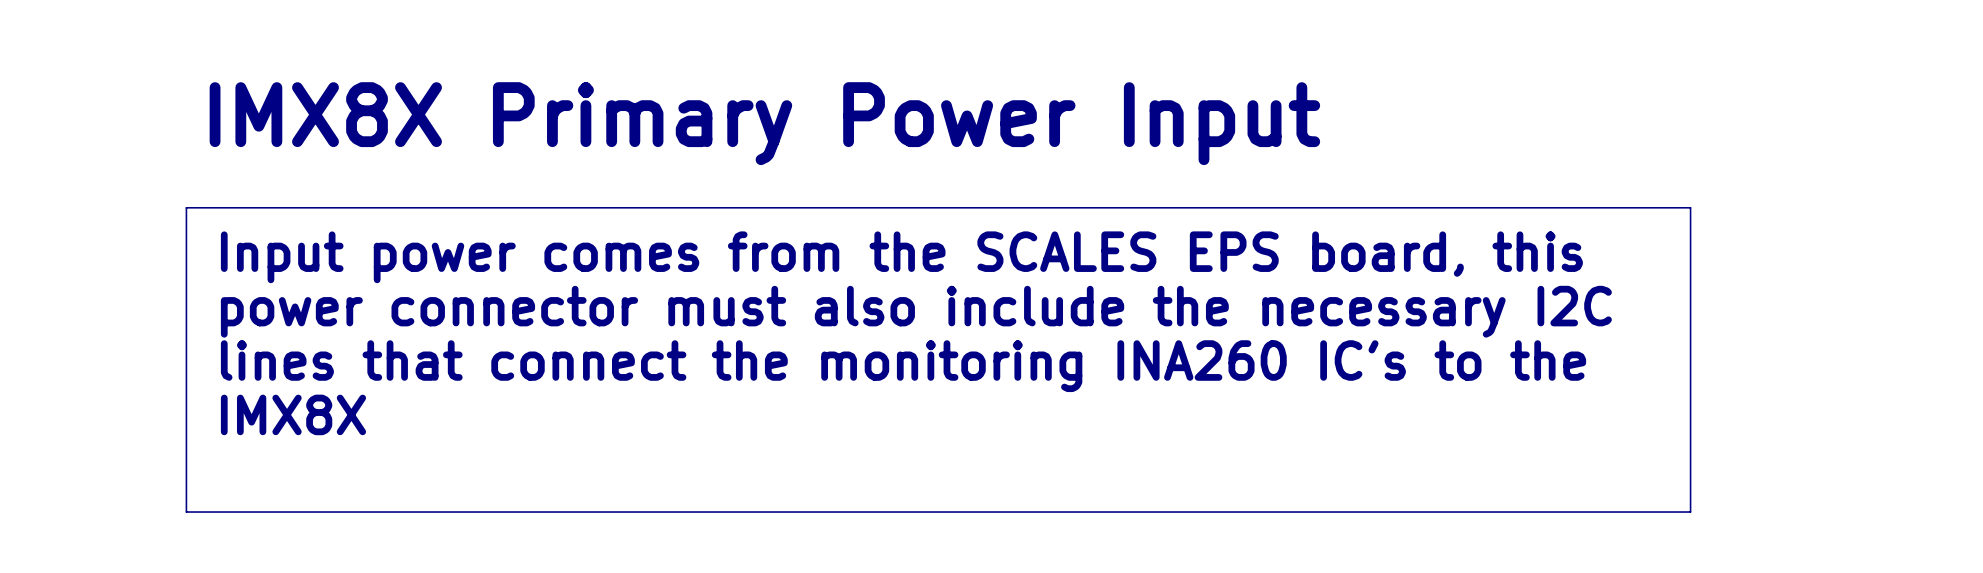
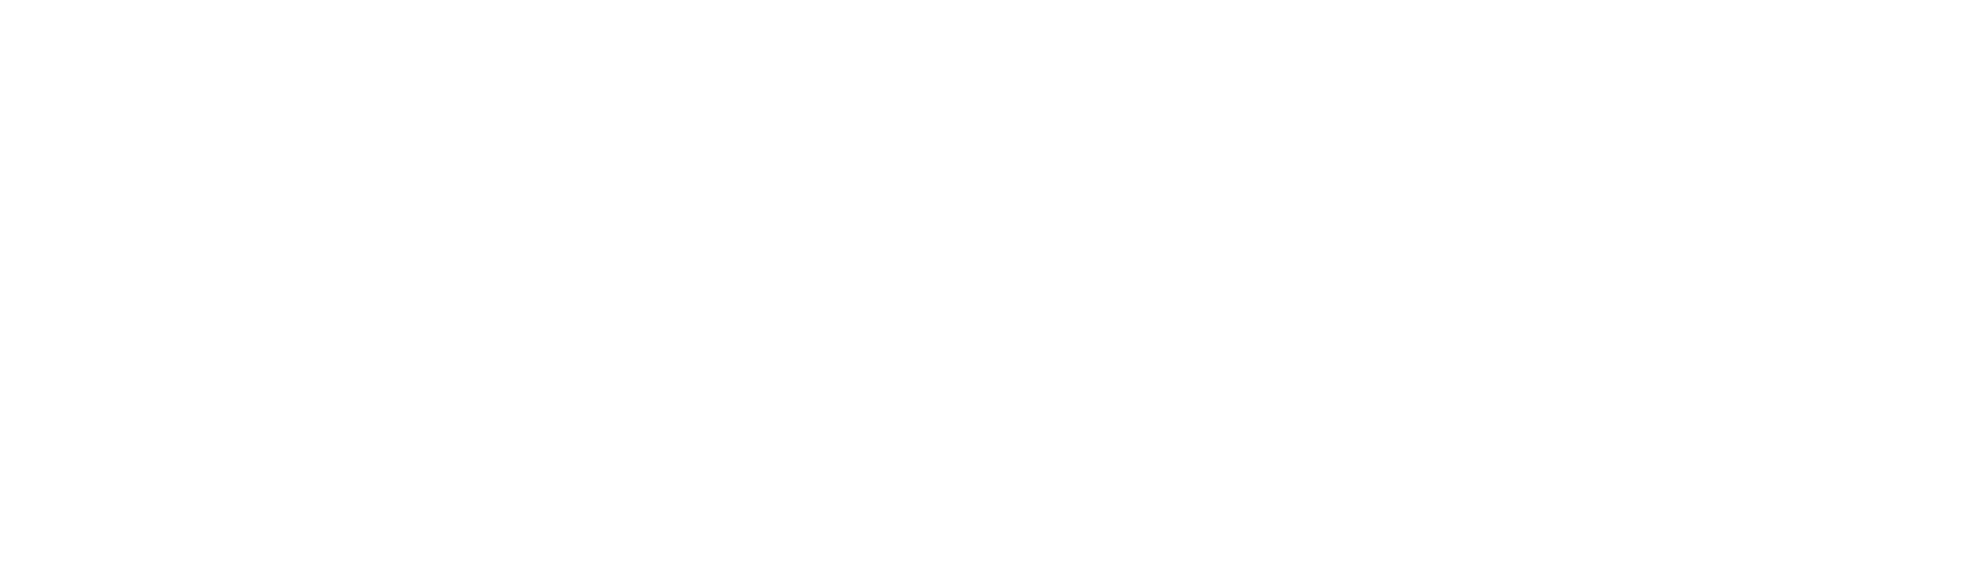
text: IMX8X Primary Power Input (764, 123) -> none
line: (186, 207) (1690, 207) (1690, 512) (186, 512) (186, 207) -> none
text: Input power comes from the SCALES EPS board, this (901, 257) -> none
text: power connector must also include the necessary I2C (916, 311) -> none
text: lines that connect the monitoring INA260 IC's to the (903, 366) -> none
text: IMX8X (293, 414) -> none

